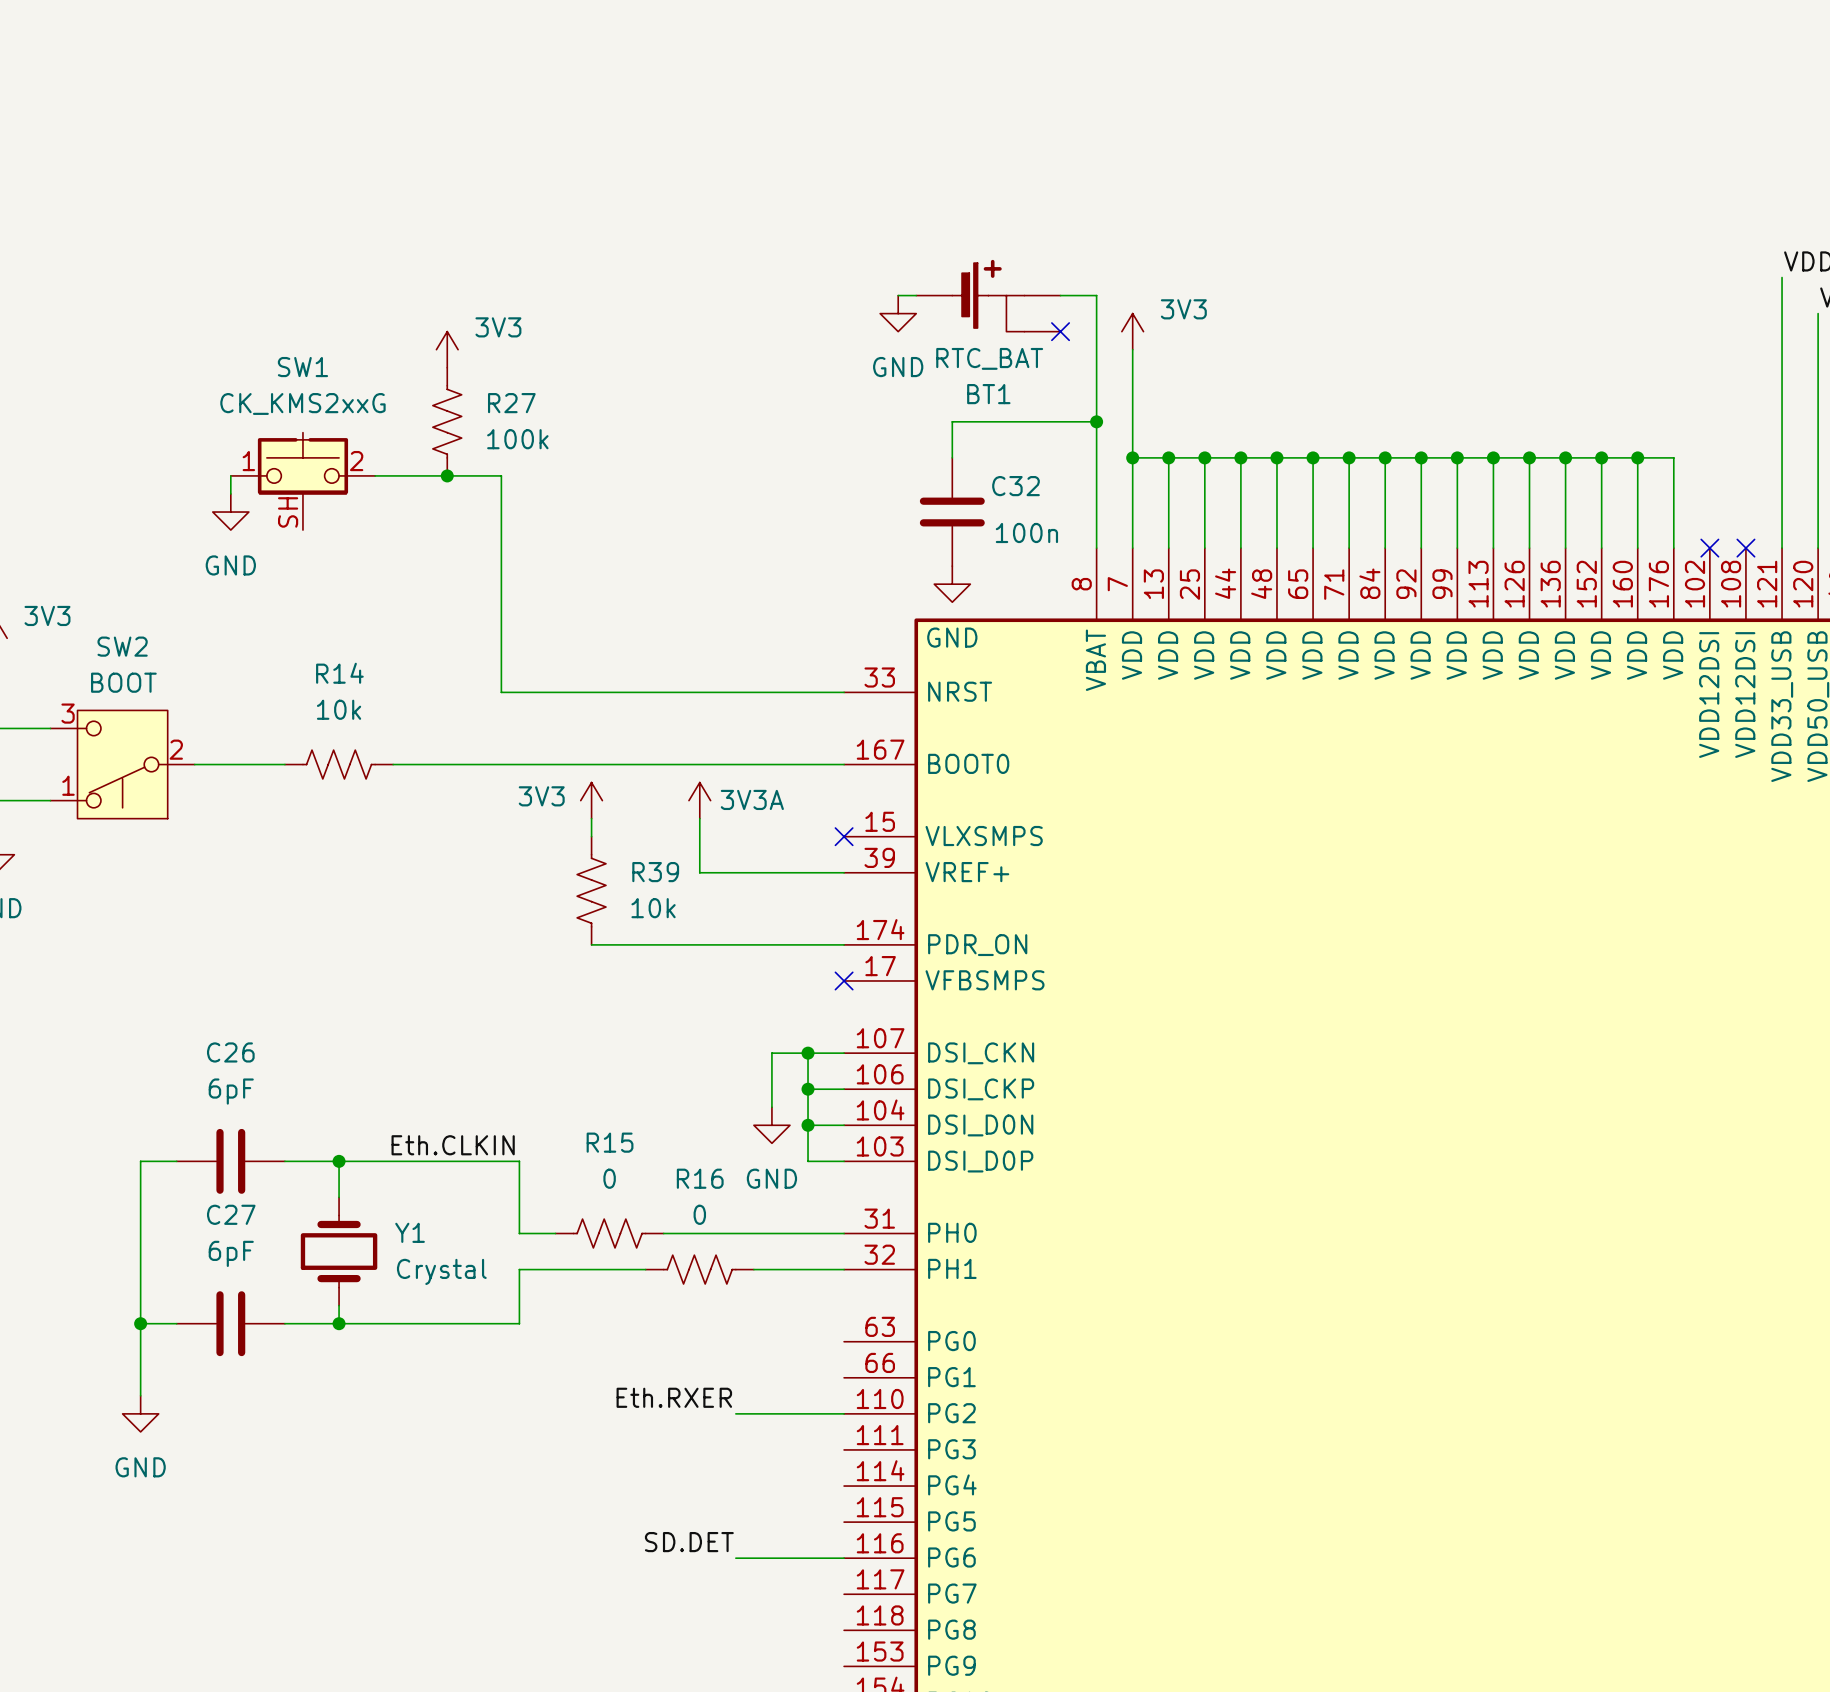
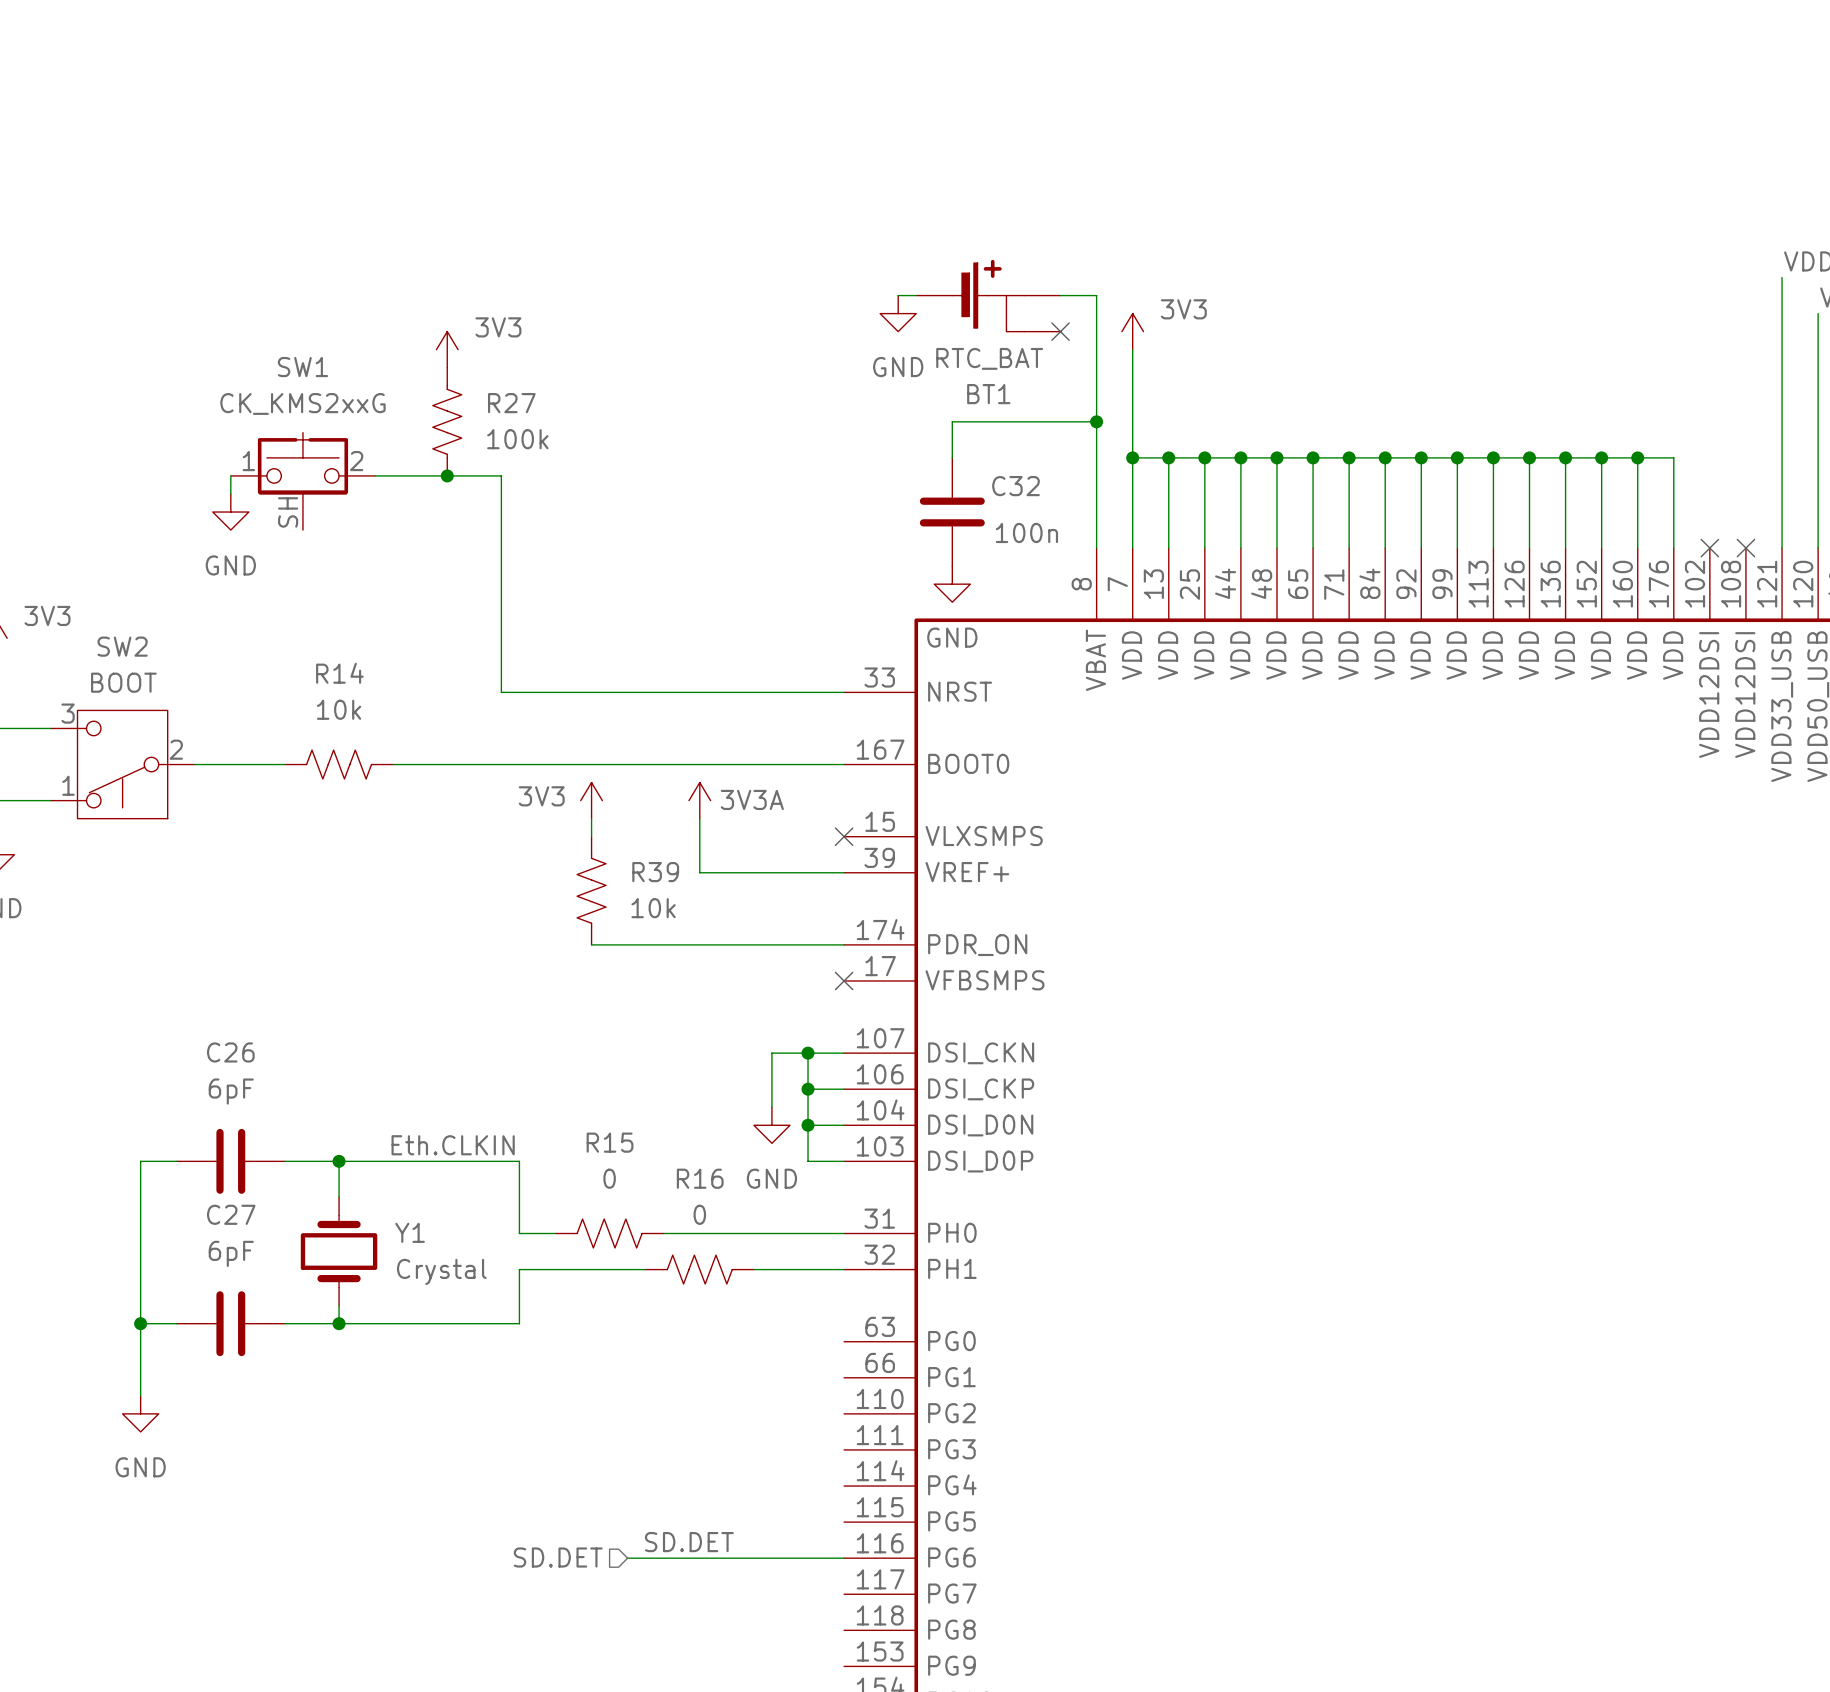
label: Eth.RXER (674, 1397) -> none
wire: (735, 1413) (844, 1413) -> (627, 1558) (735, 1558)
hierarchical label: none -> SD.DET (558, 1557)

